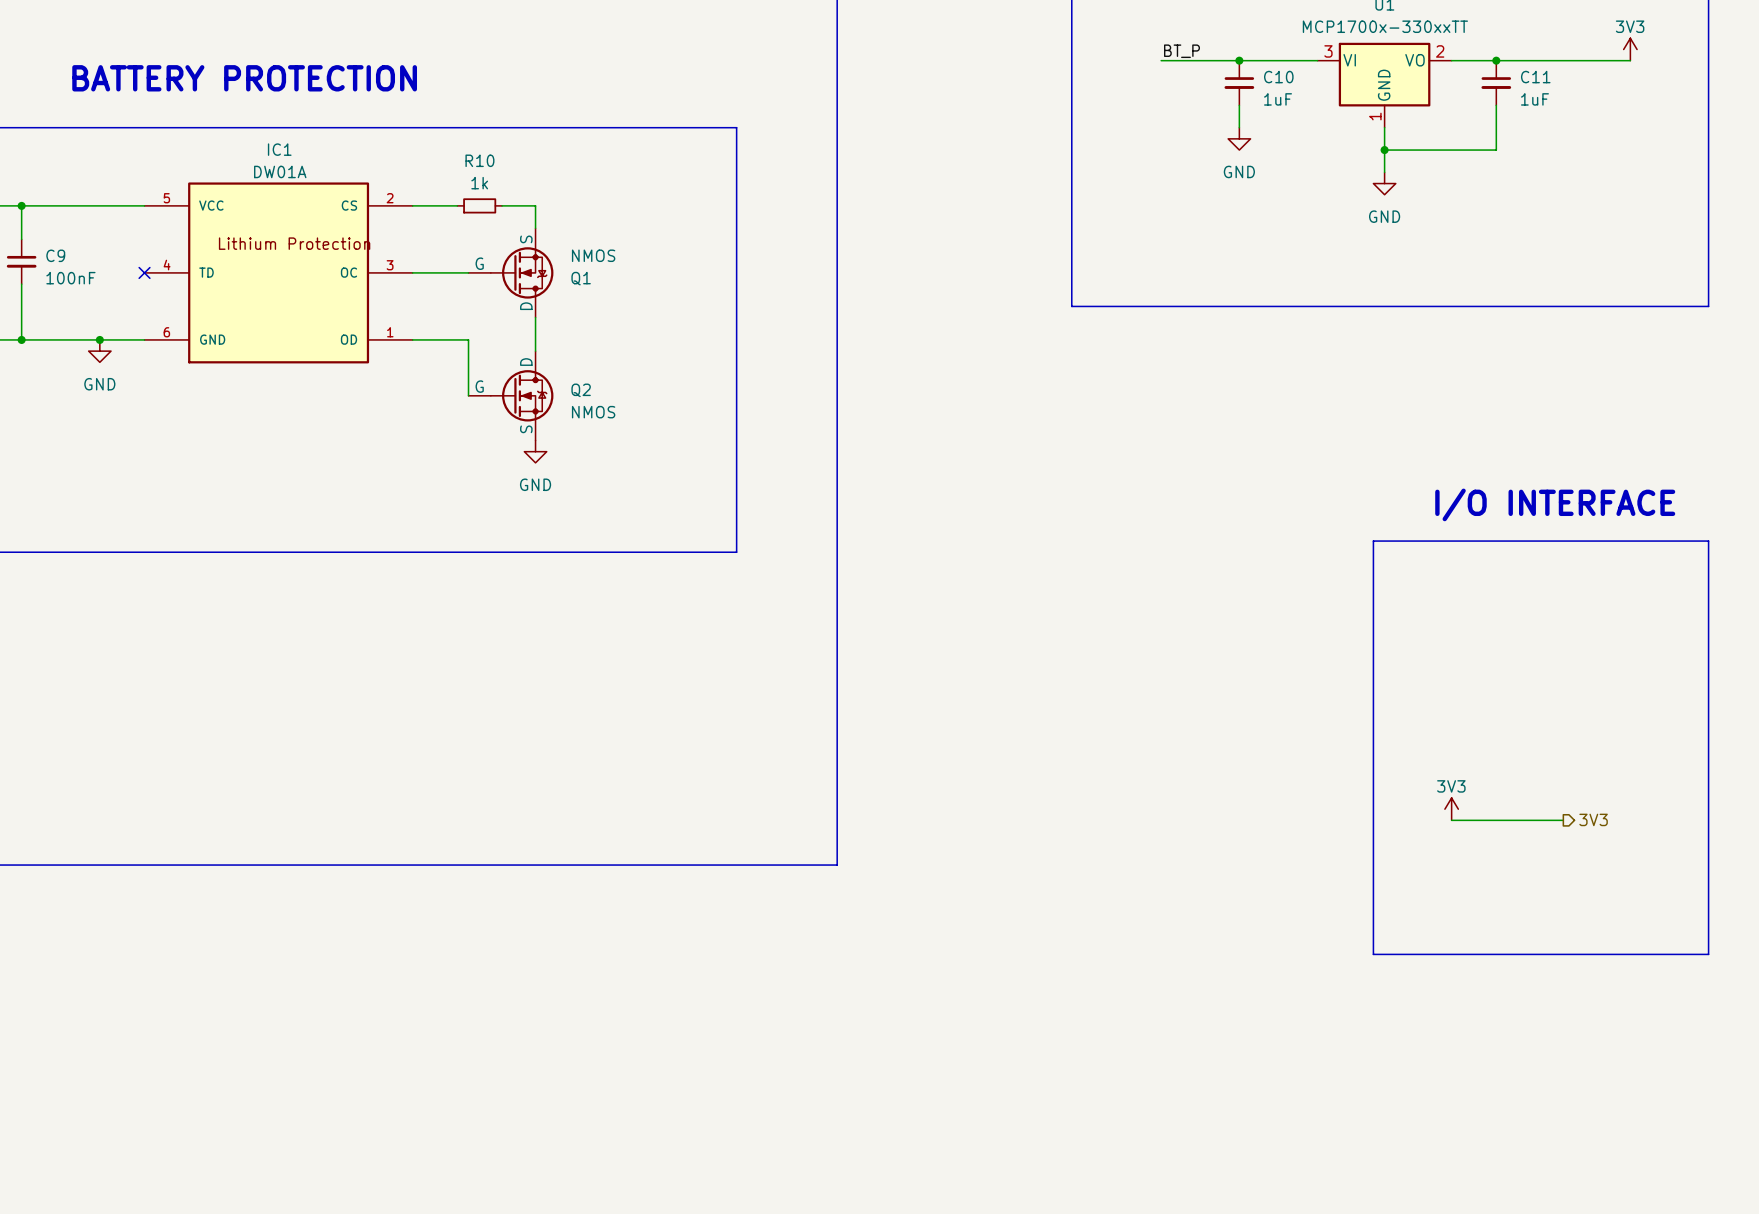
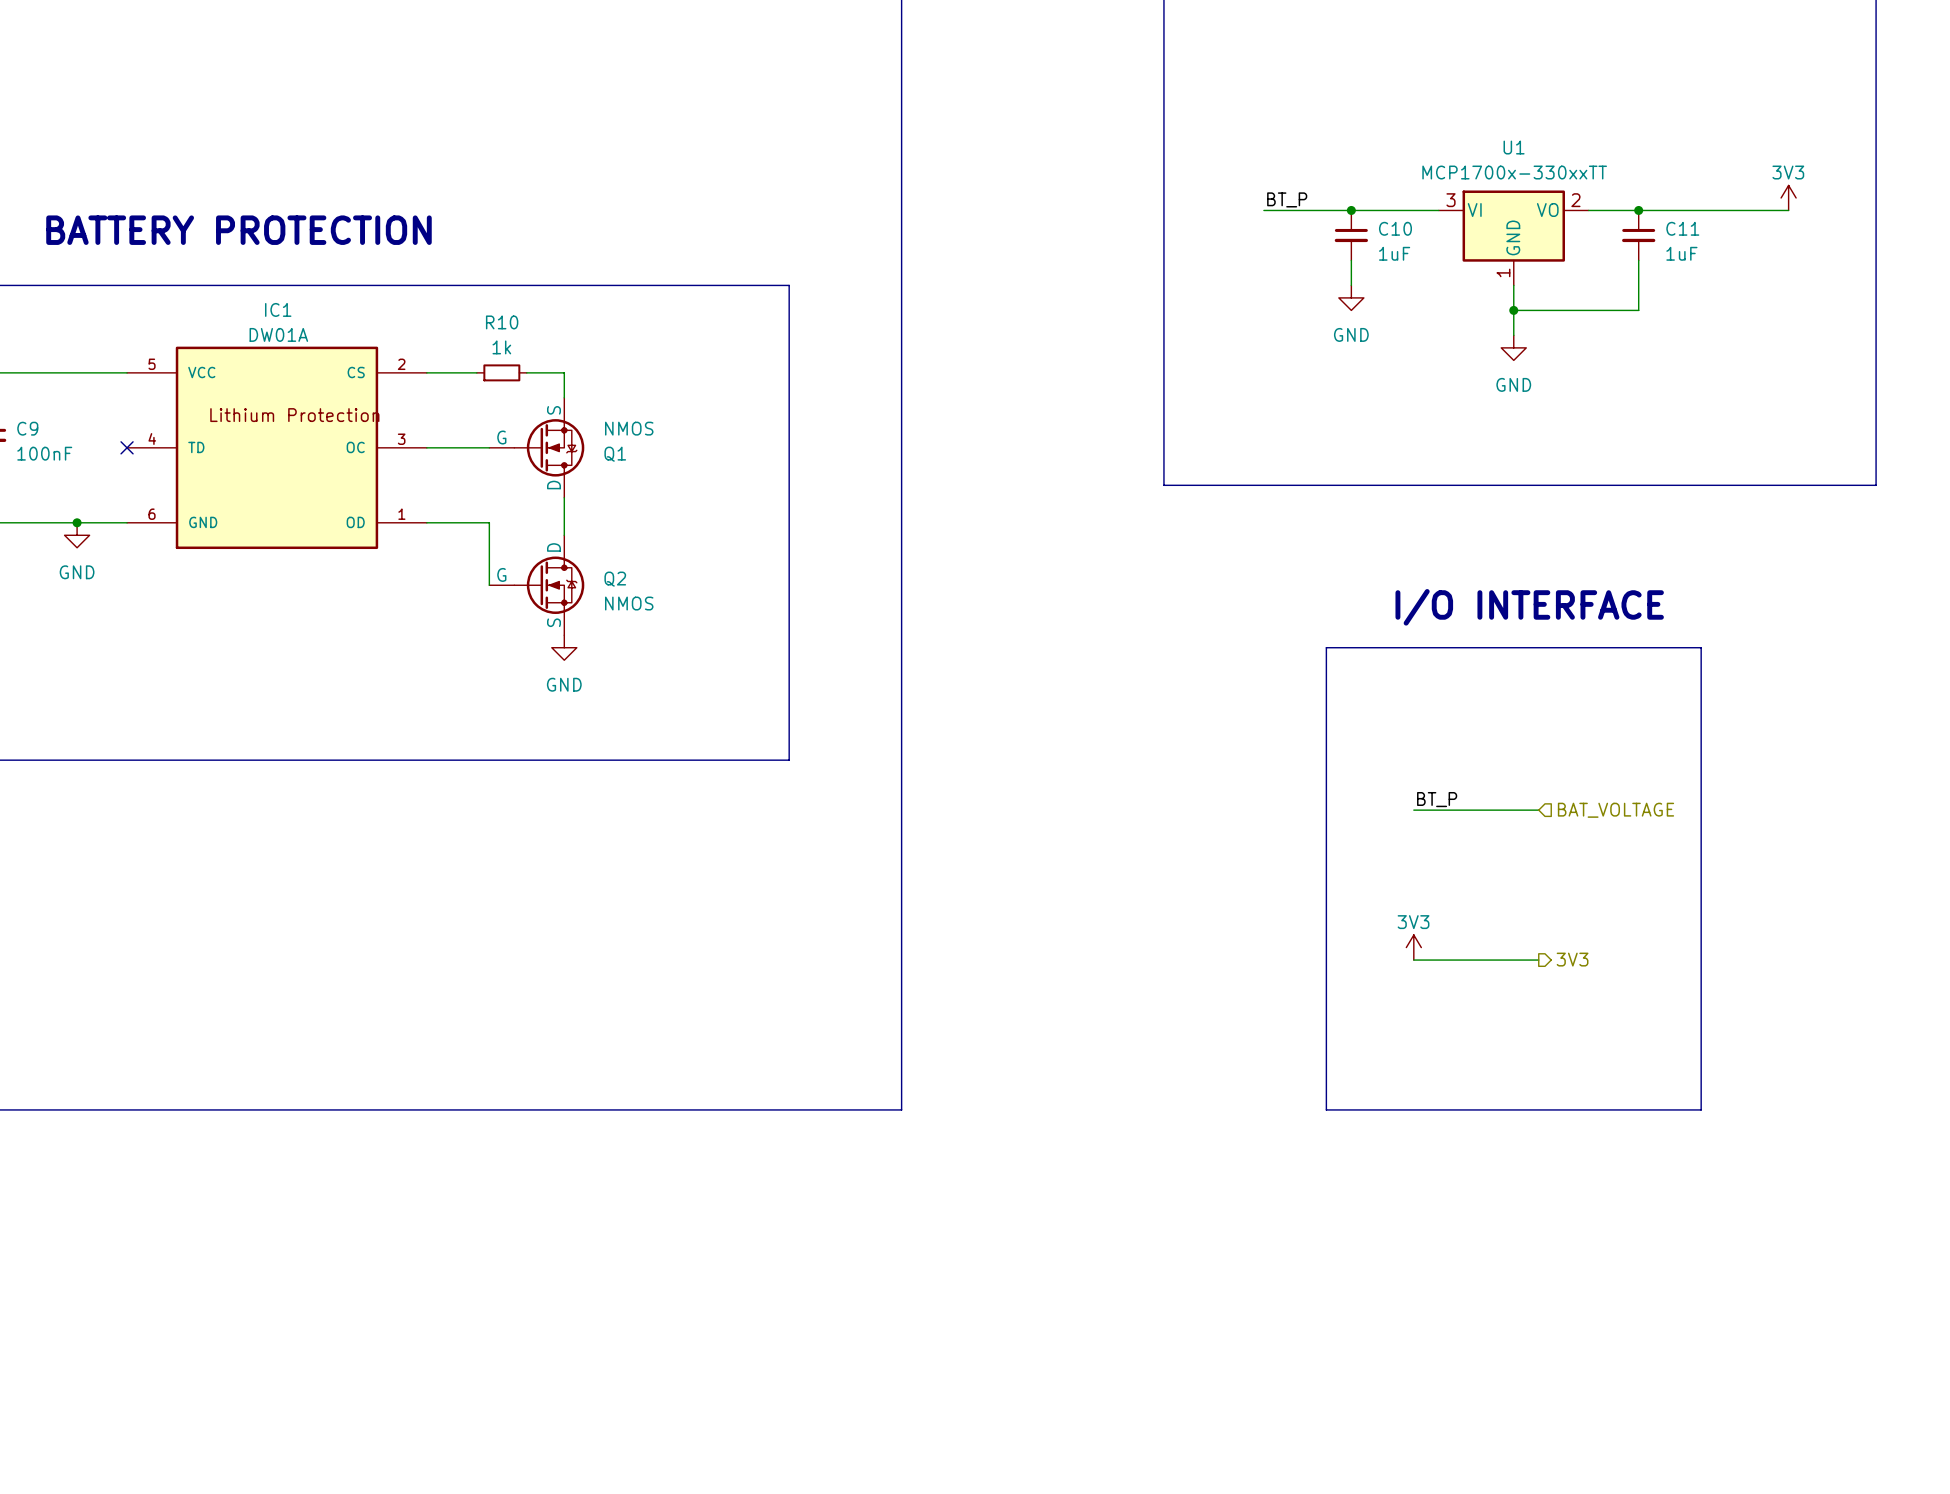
text position: I/O INTERFACE (1555, 504) -> I/O INTERFACE (1529, 607)
line: (1373, 541) (1708, 541) (1708, 954) (1373, 954) (1373, 541) -> (1326, 647) (1701, 647) (1701, 1109) (1326, 1109) (1326, 647)
label: none -> BT_P (1437, 799)
wire: none -> (1413, 810) (1538, 810)
hierarchical label: none -> BAT_VOLTAGE (1615, 810)
power symbol position: 3V3 (1451, 809) -> 3V3 (1413, 947)
hierarchical label position: 3V3 (1593, 819) -> 3V3 (1572, 959)
wire: (1451, 820) (1563, 820) -> (1413, 960) (1538, 960)

